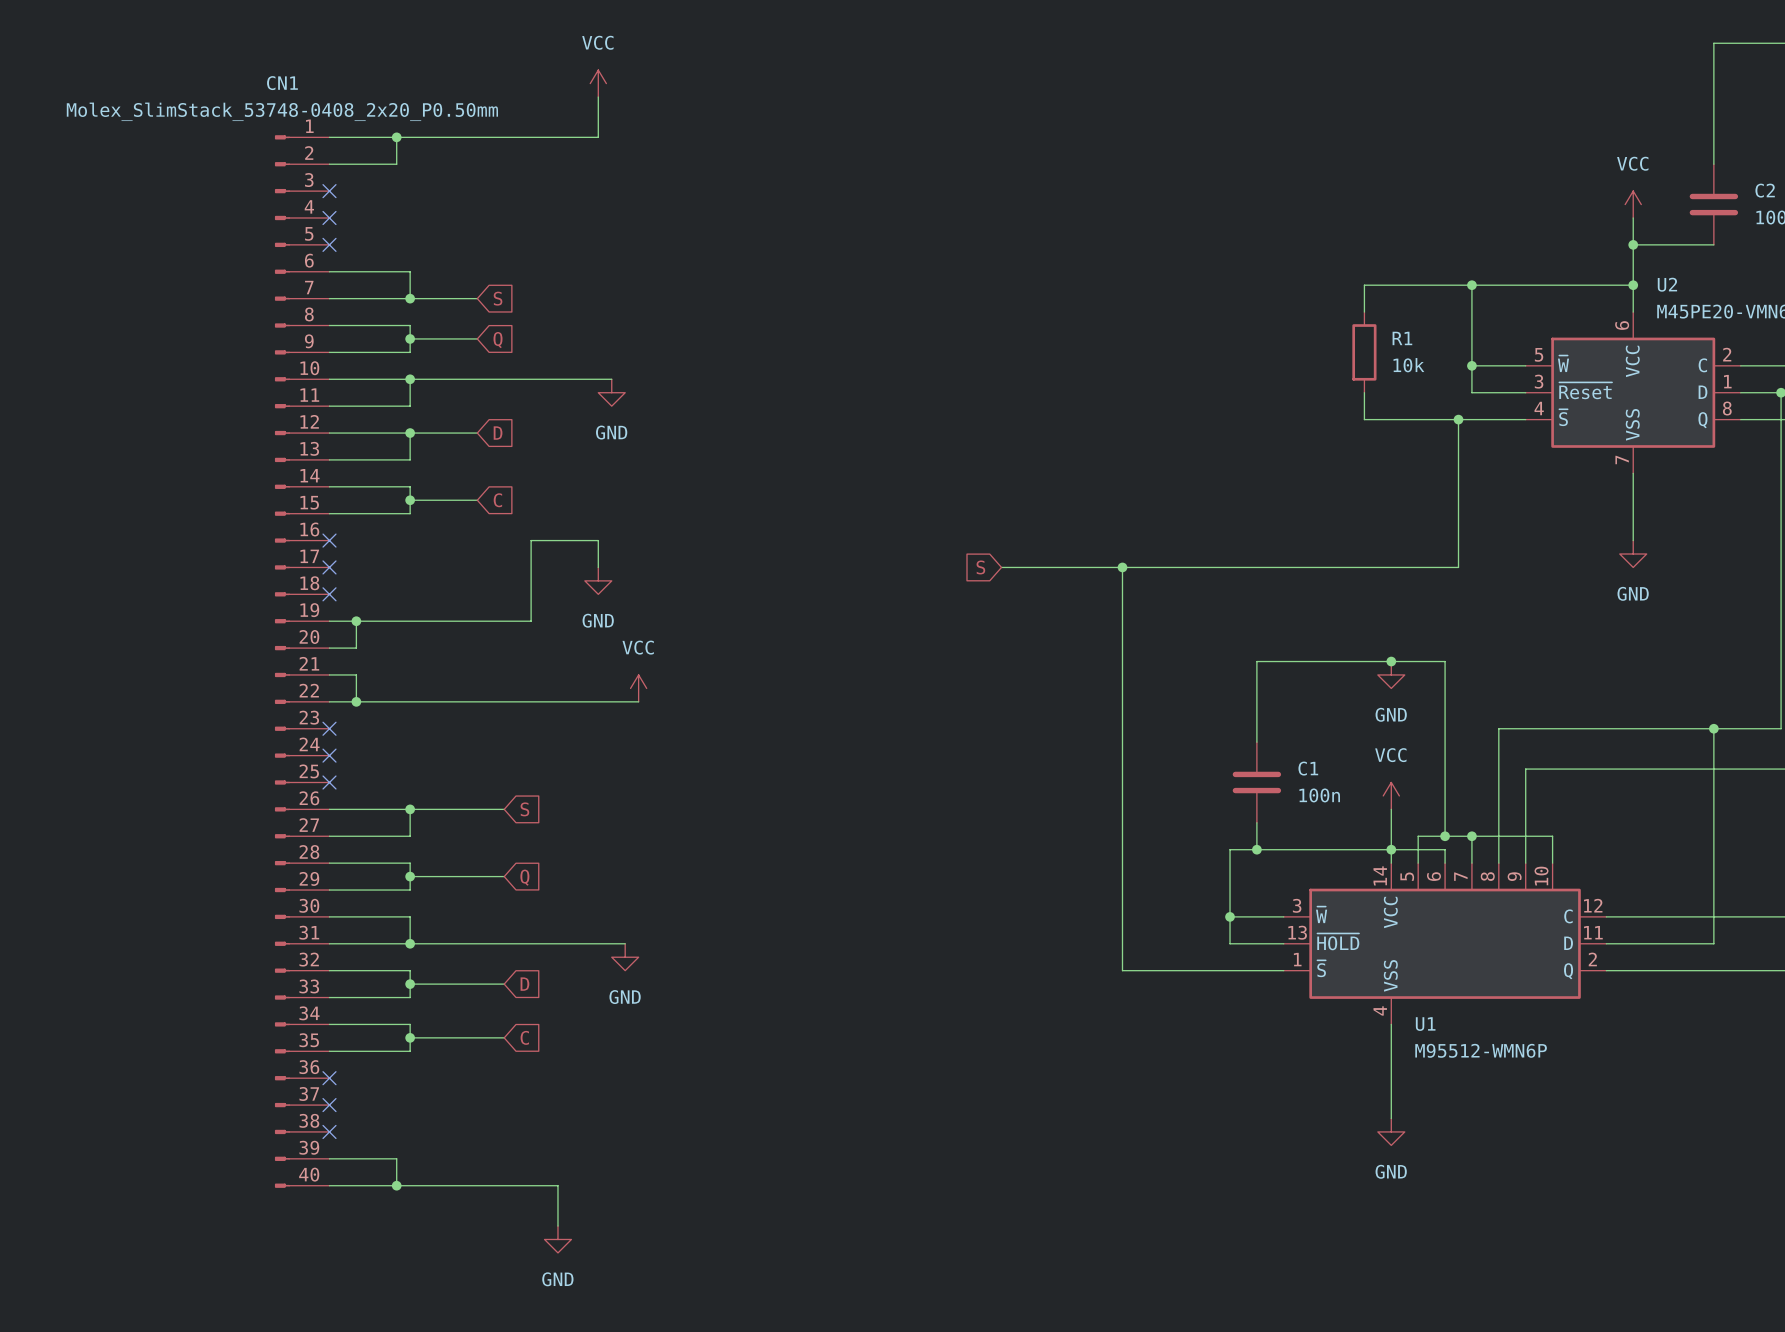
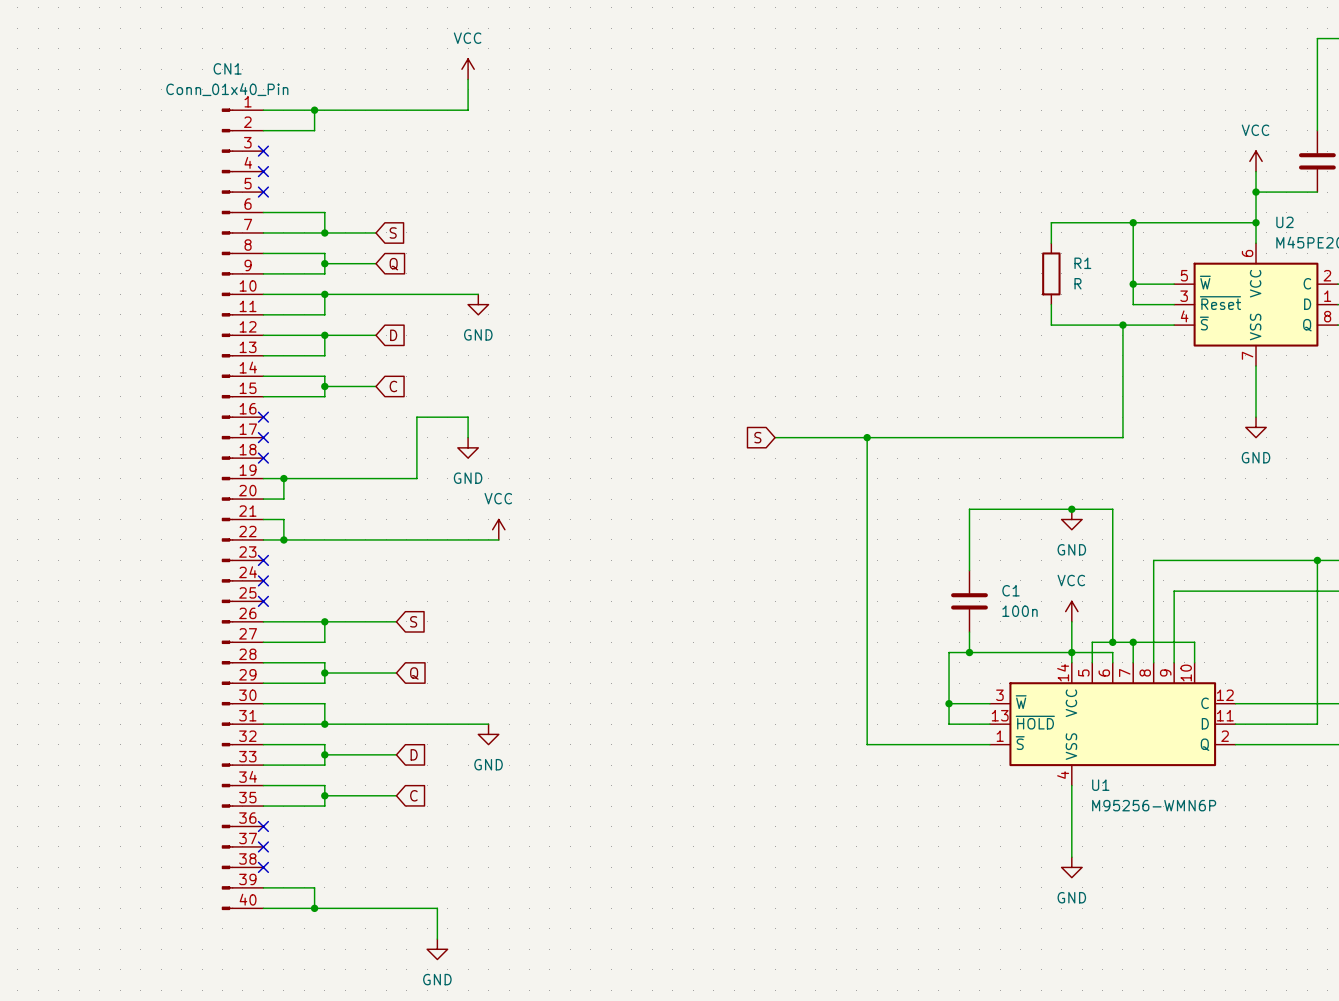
CN1 value: Molex_SlimStack_53748-0408_2x20_P0.50mm (282, 111) -> Conn_01x40_Pin (227, 89)
R1 value: 10k (1408, 365) -> R (1077, 283)
U1 value: M95512-WMN6P (1481, 1050) -> M95256-WMN6P (1154, 805)

